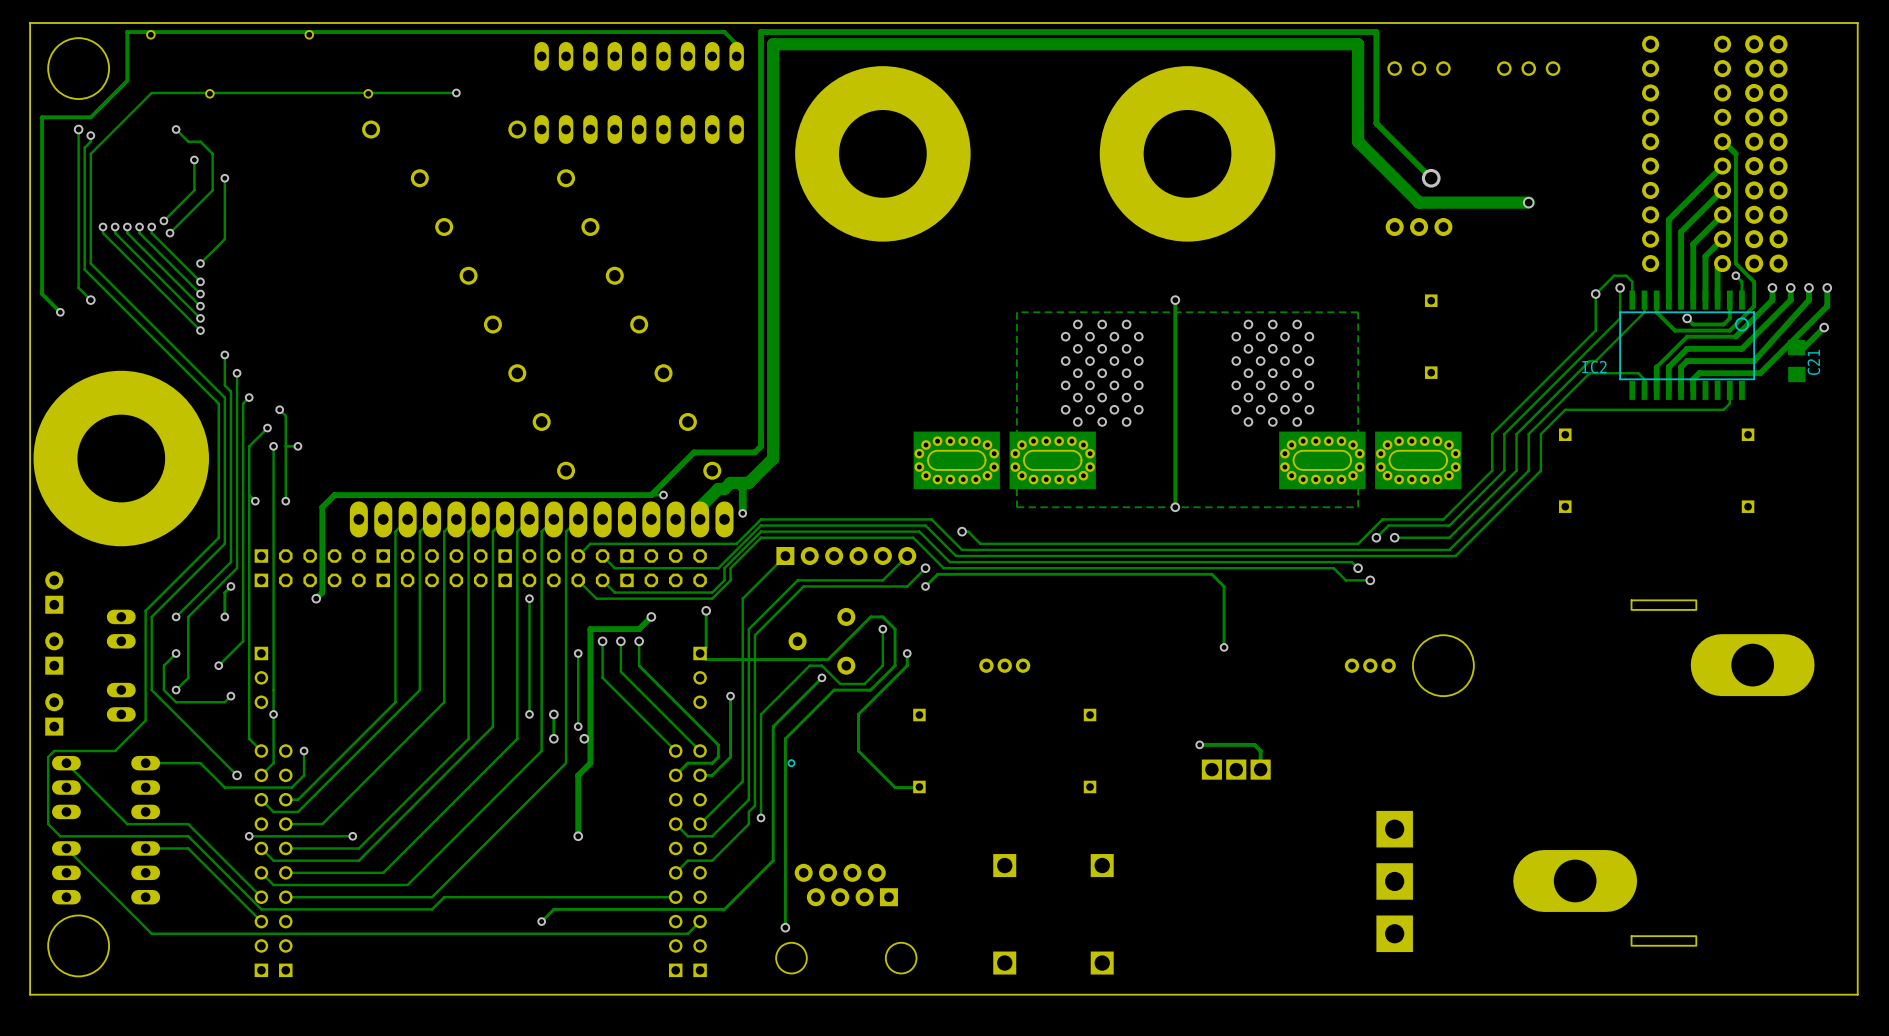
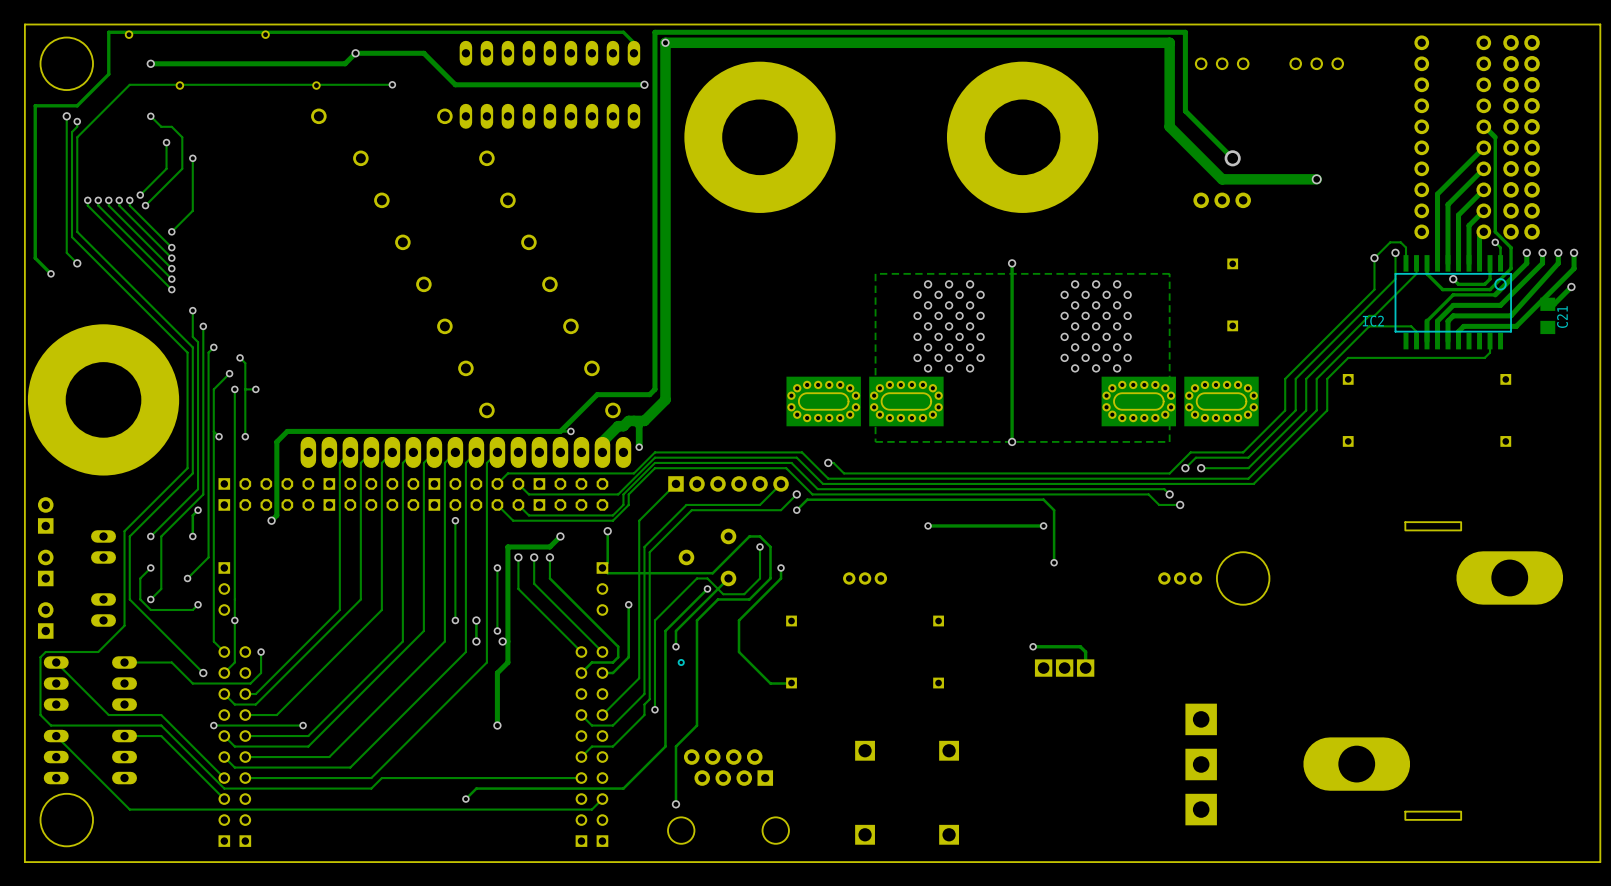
via: none -> (665, 42)
via: none -> (355, 53)
track: none -> (150, 63) (345, 63) (355, 53) (423, 53) (455, 84) (644, 84)
via: none -> (150, 63)
via: none -> (644, 84)
via: none -> (928, 525)
track: none -> (1043, 525) (928, 525)
via: none -> (1043, 525)
track: (809, 714) (785, 738) -> (728, 578) (675, 631) (675, 641)
track: (785, 744) (785, 860) -> (696, 620) (696, 725) (675, 746)
via: none -> (675, 646)

